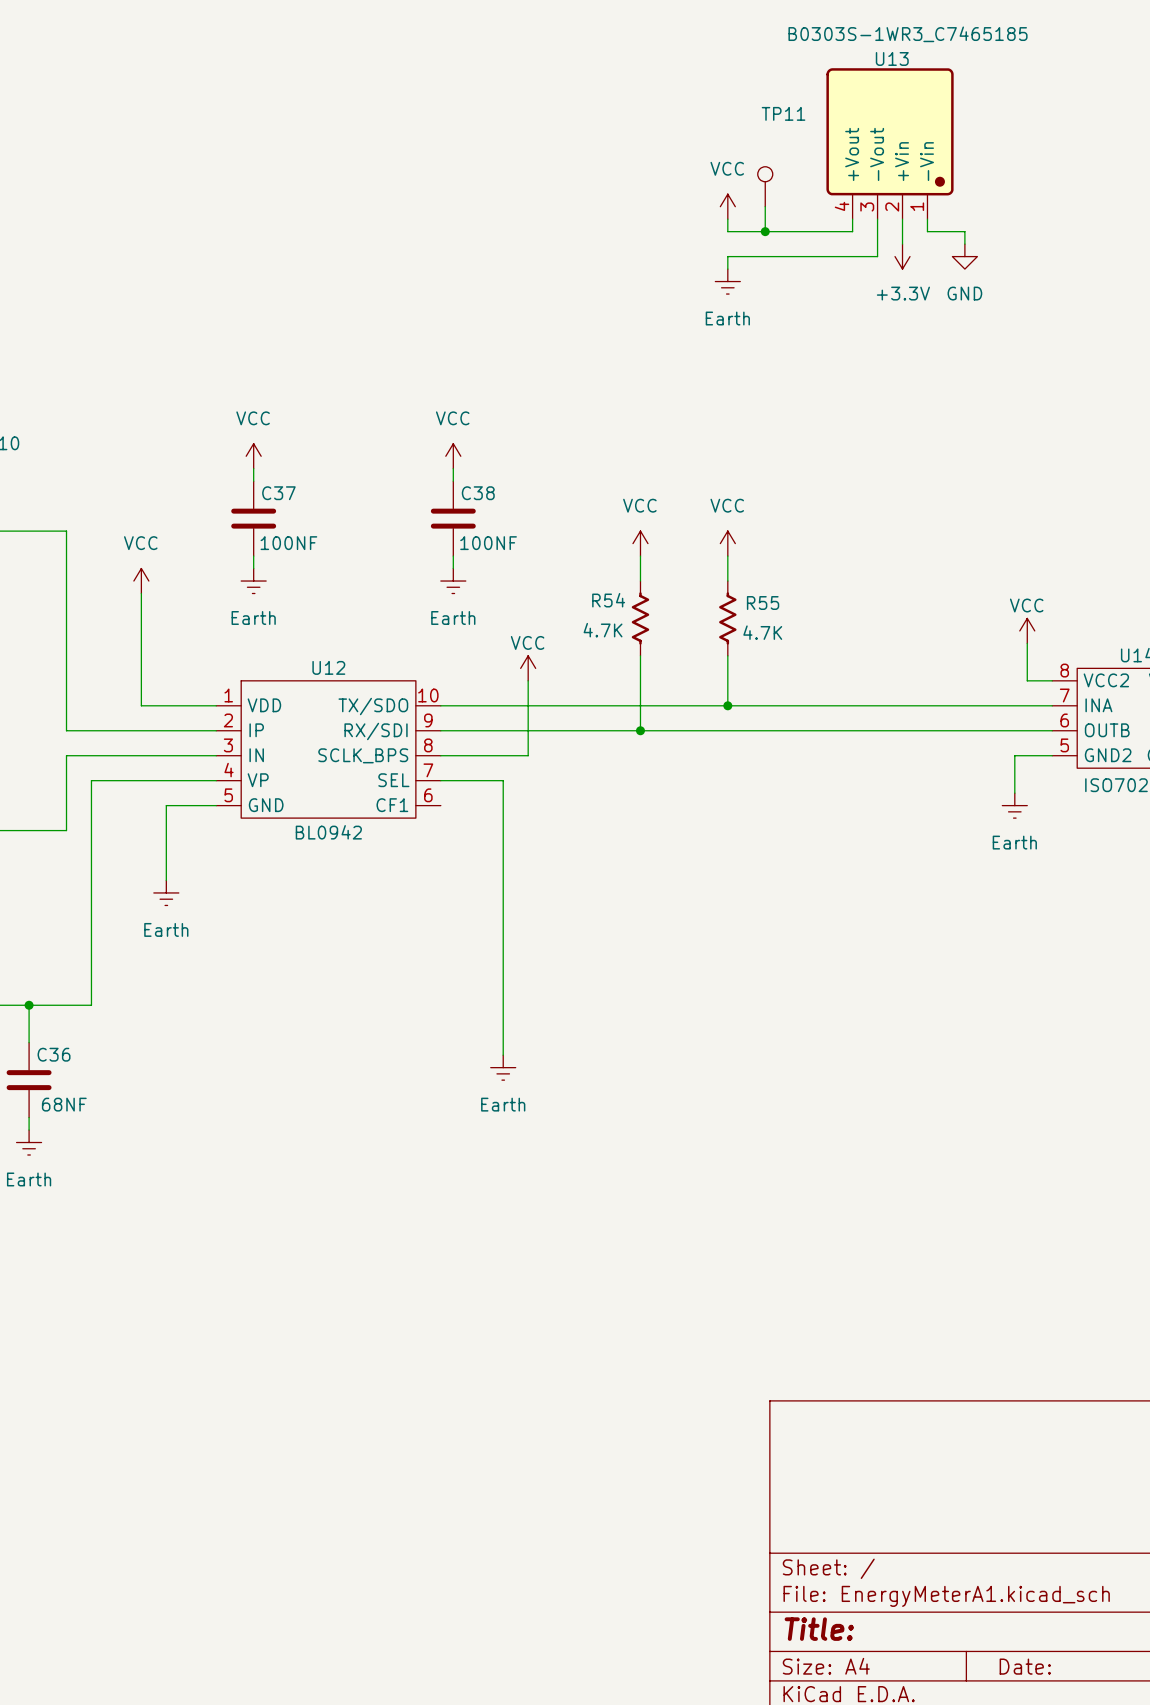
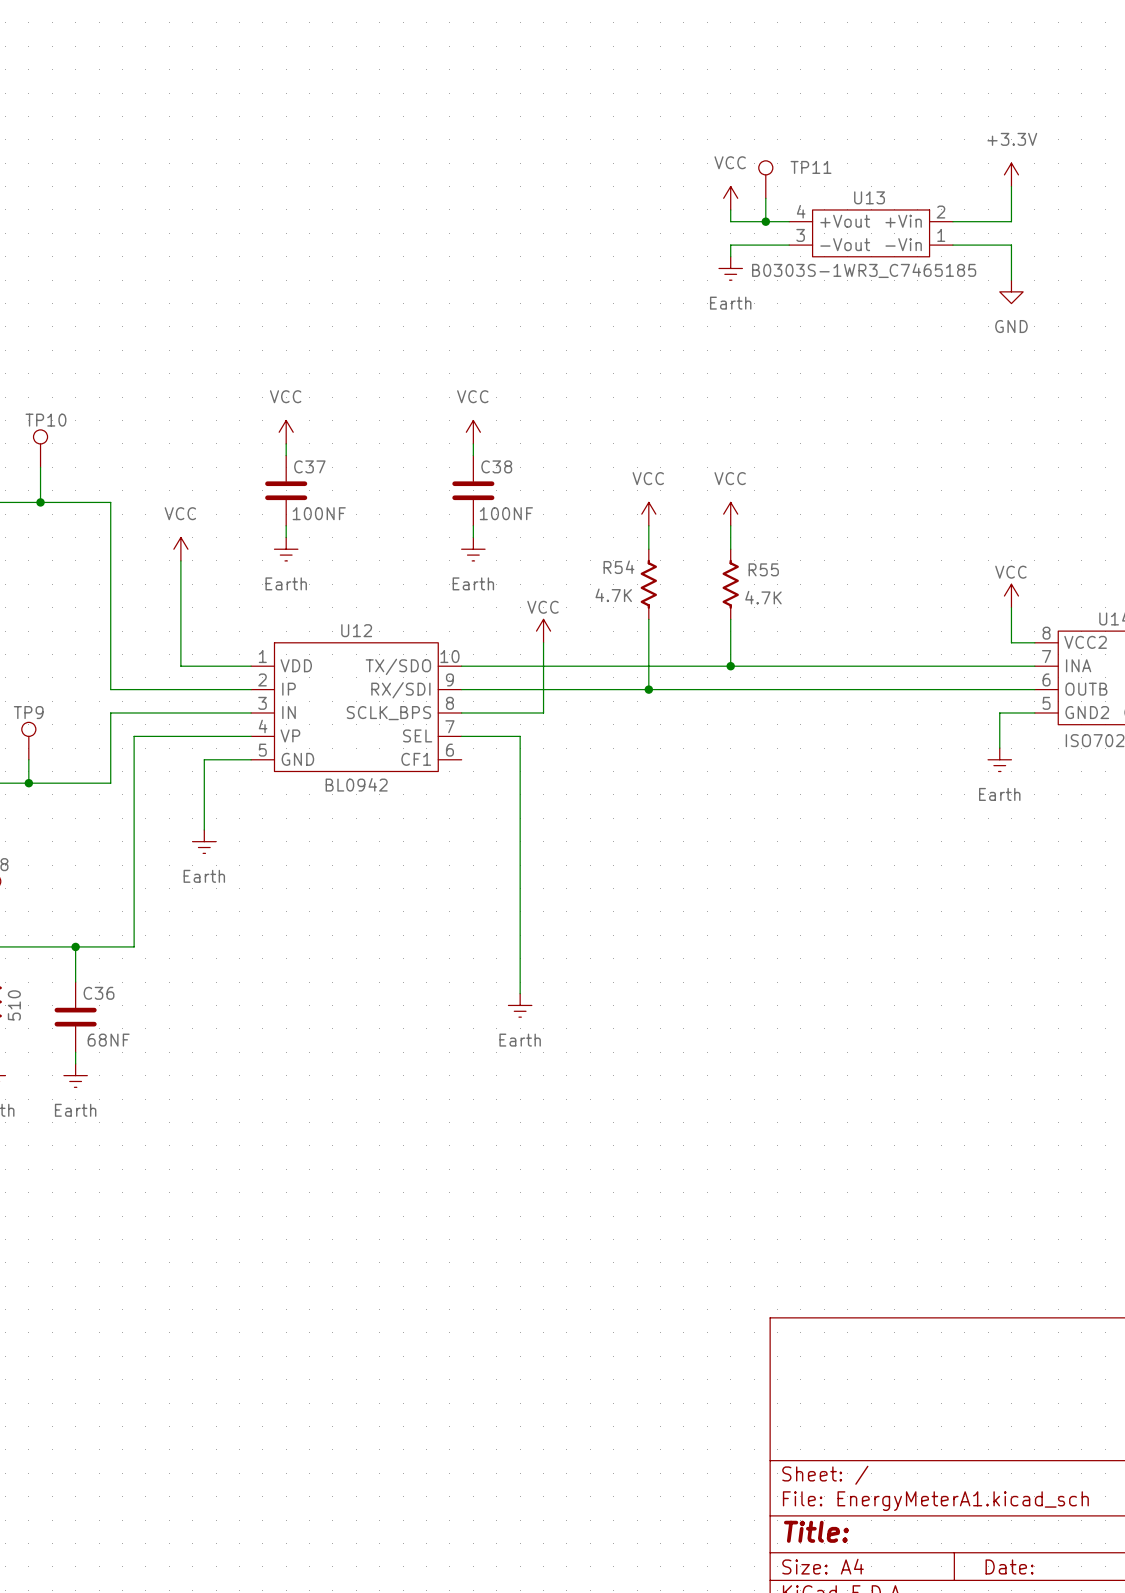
U13 value position: B0303S-1WR3_C7465185 (908, 34) -> B0303S-1WR3_C7465185 (864, 270)
U13 name position: U13 (892, 58) -> U13 (869, 197)
U13 symbol: [826, 68, 954, 220] -> [789, 209, 953, 257]
TP11 name position: TP11 (783, 113) -> TP11 (811, 167)
wire: none -> (1011, 186) (1011, 221) (952, 221)
wire: (852, 219) (852, 231) (790, 231) -> none
wire: (877, 219) (877, 256) (790, 256) -> none
wire: (902, 219) (902, 244) -> none
wire: (927, 219) (927, 231) (964, 231) (964, 244) -> none
power symbol rotation: 0° (902, 256) -> 180° (1011, 174)
power symbol position: +3.3V (902, 256) -> +3.3V (1011, 174)
wire: none -> (952, 245) (1011, 245) (1011, 280)
power symbol position: GND (964, 256) -> GND (1011, 291)

